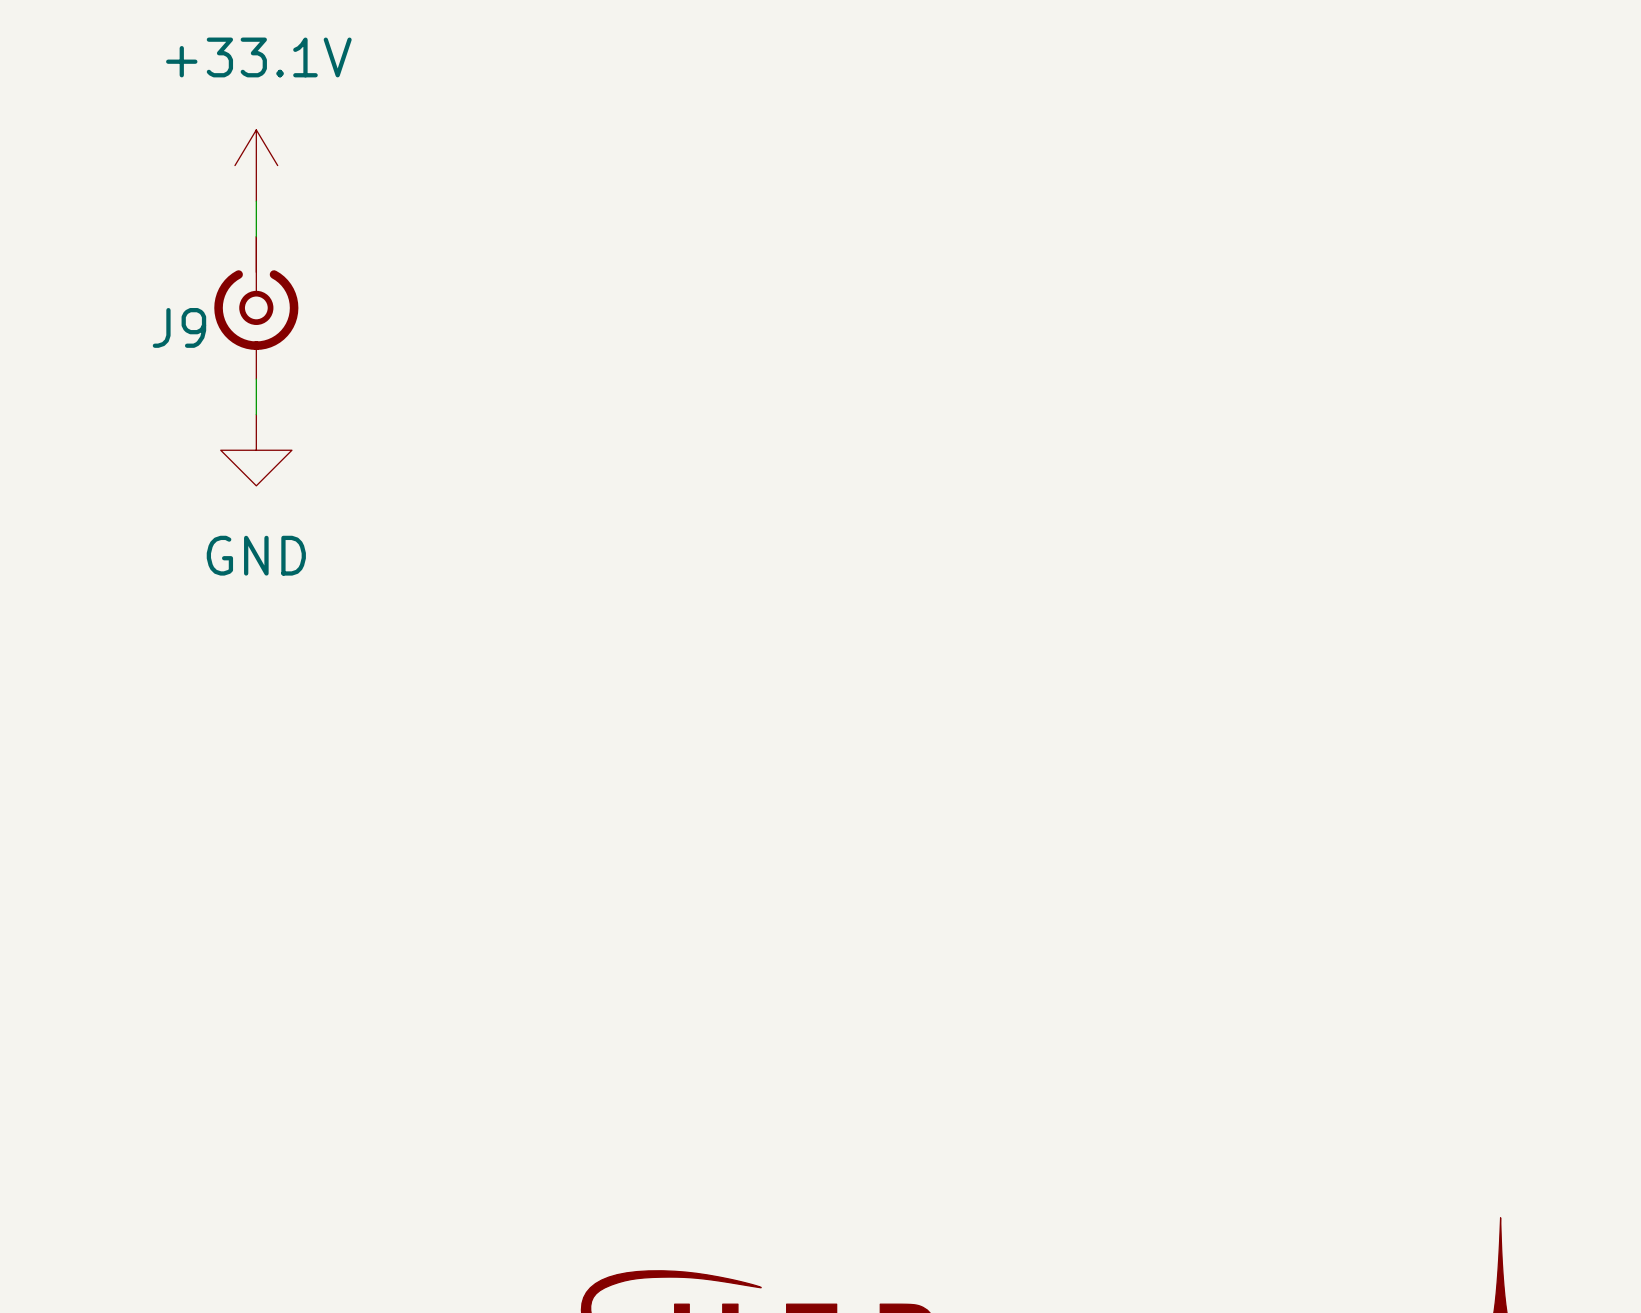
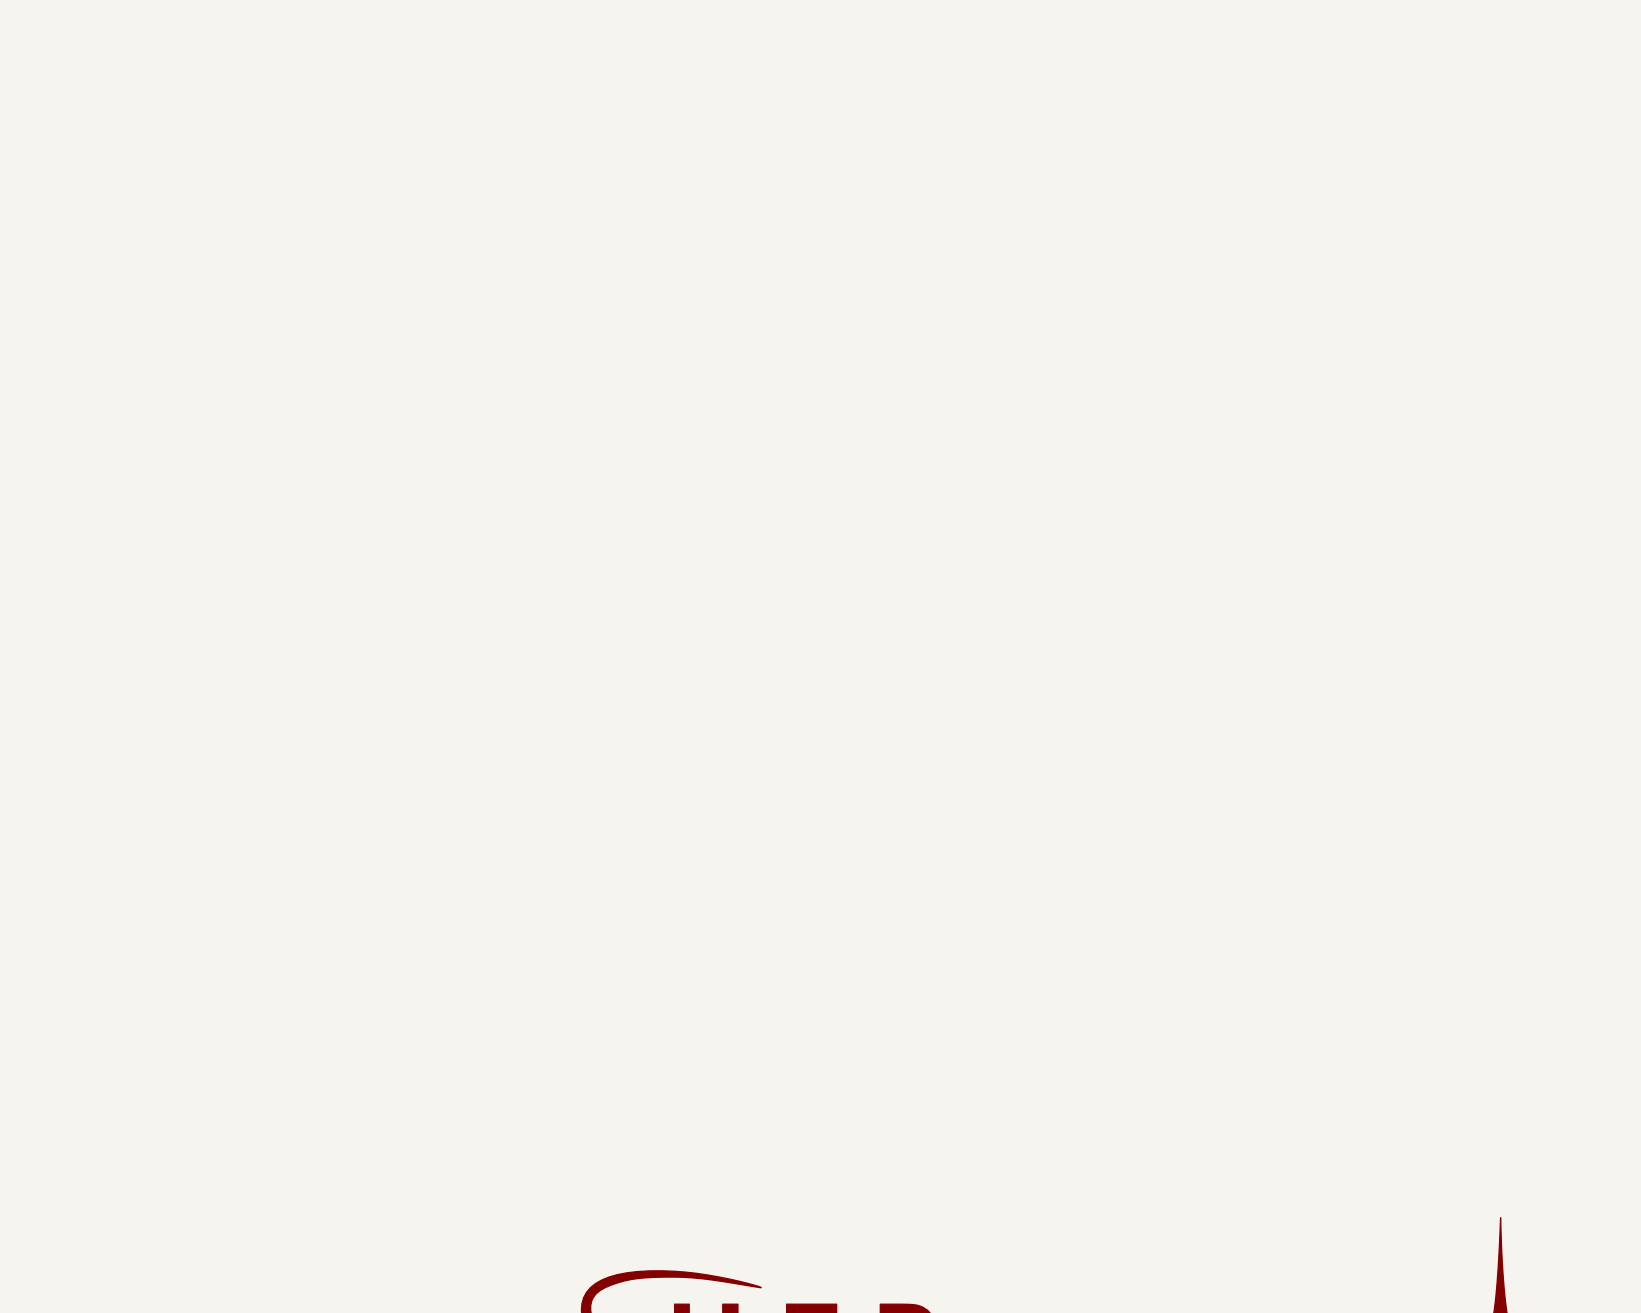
power symbol: +33.1V (256, 165) -> none
wire: (256, 201) (256, 236) -> none
J9: (256, 307) -> none
wire: (256, 379) (256, 414) -> none
power symbol: GND (256, 450) -> none

